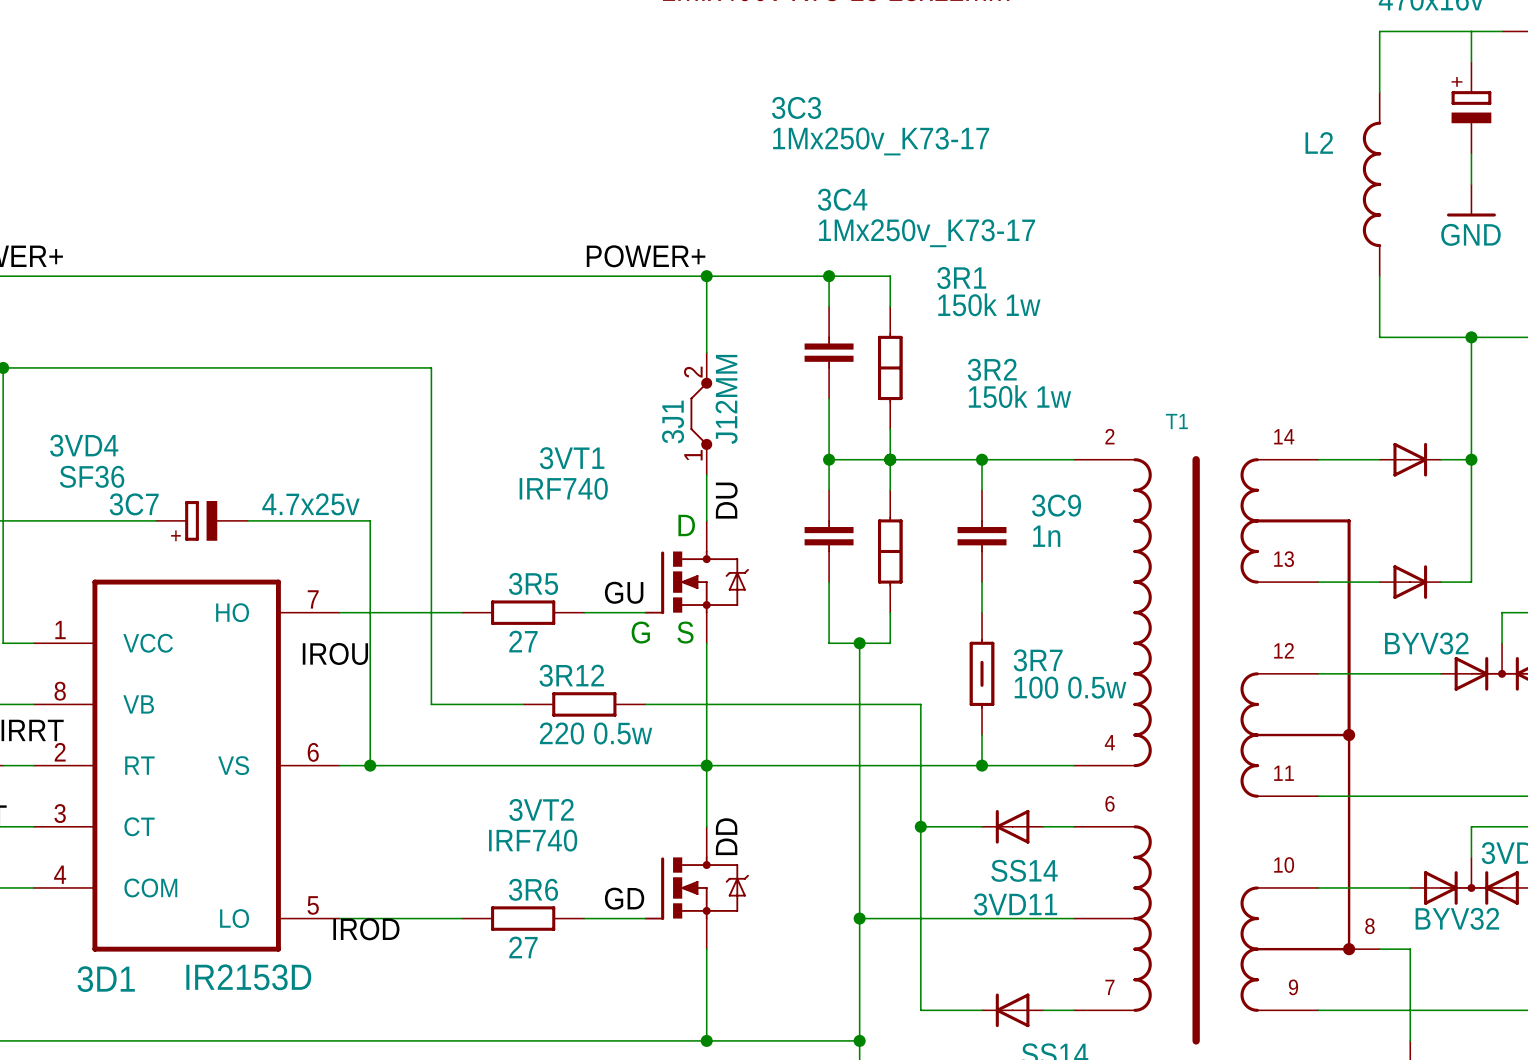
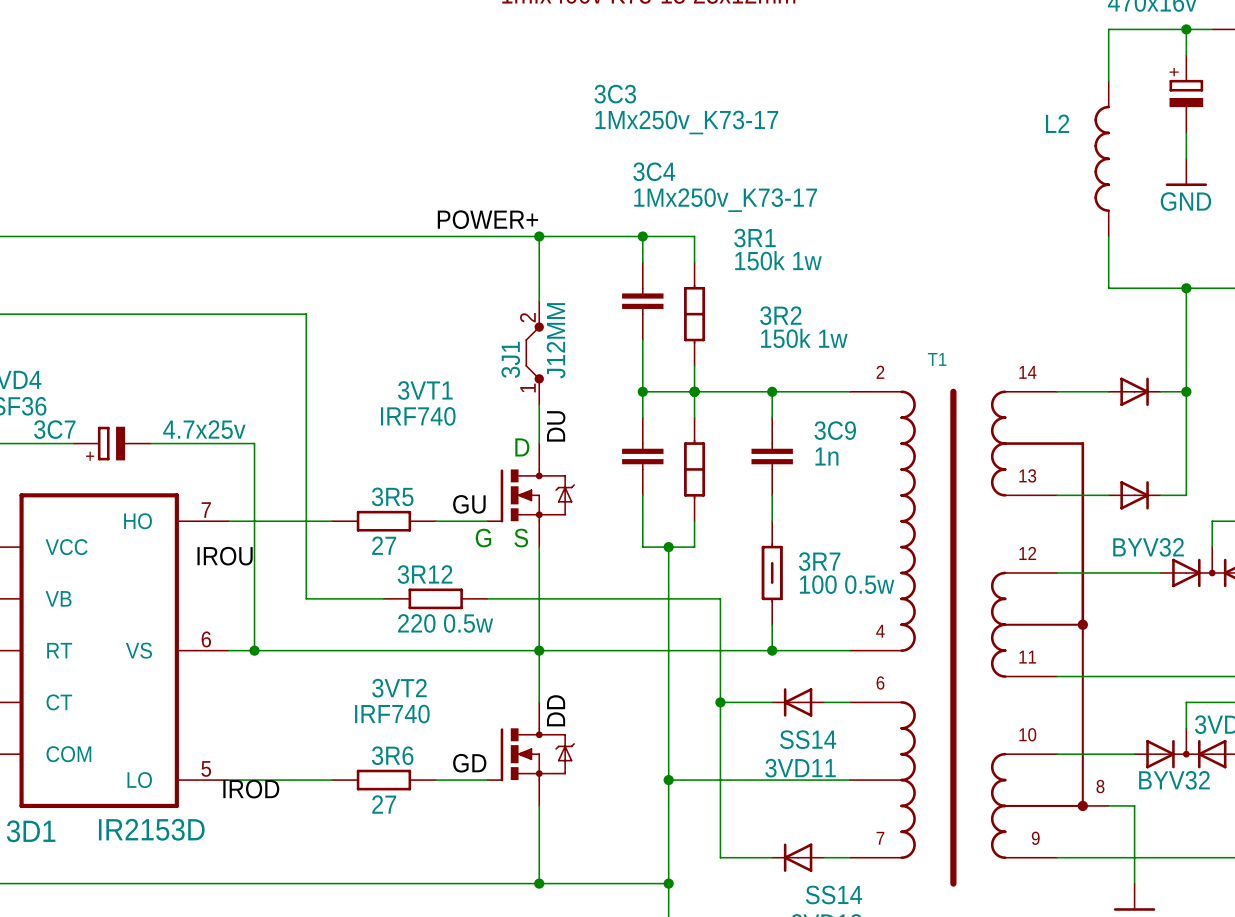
junction: none -> (1186, 29)

